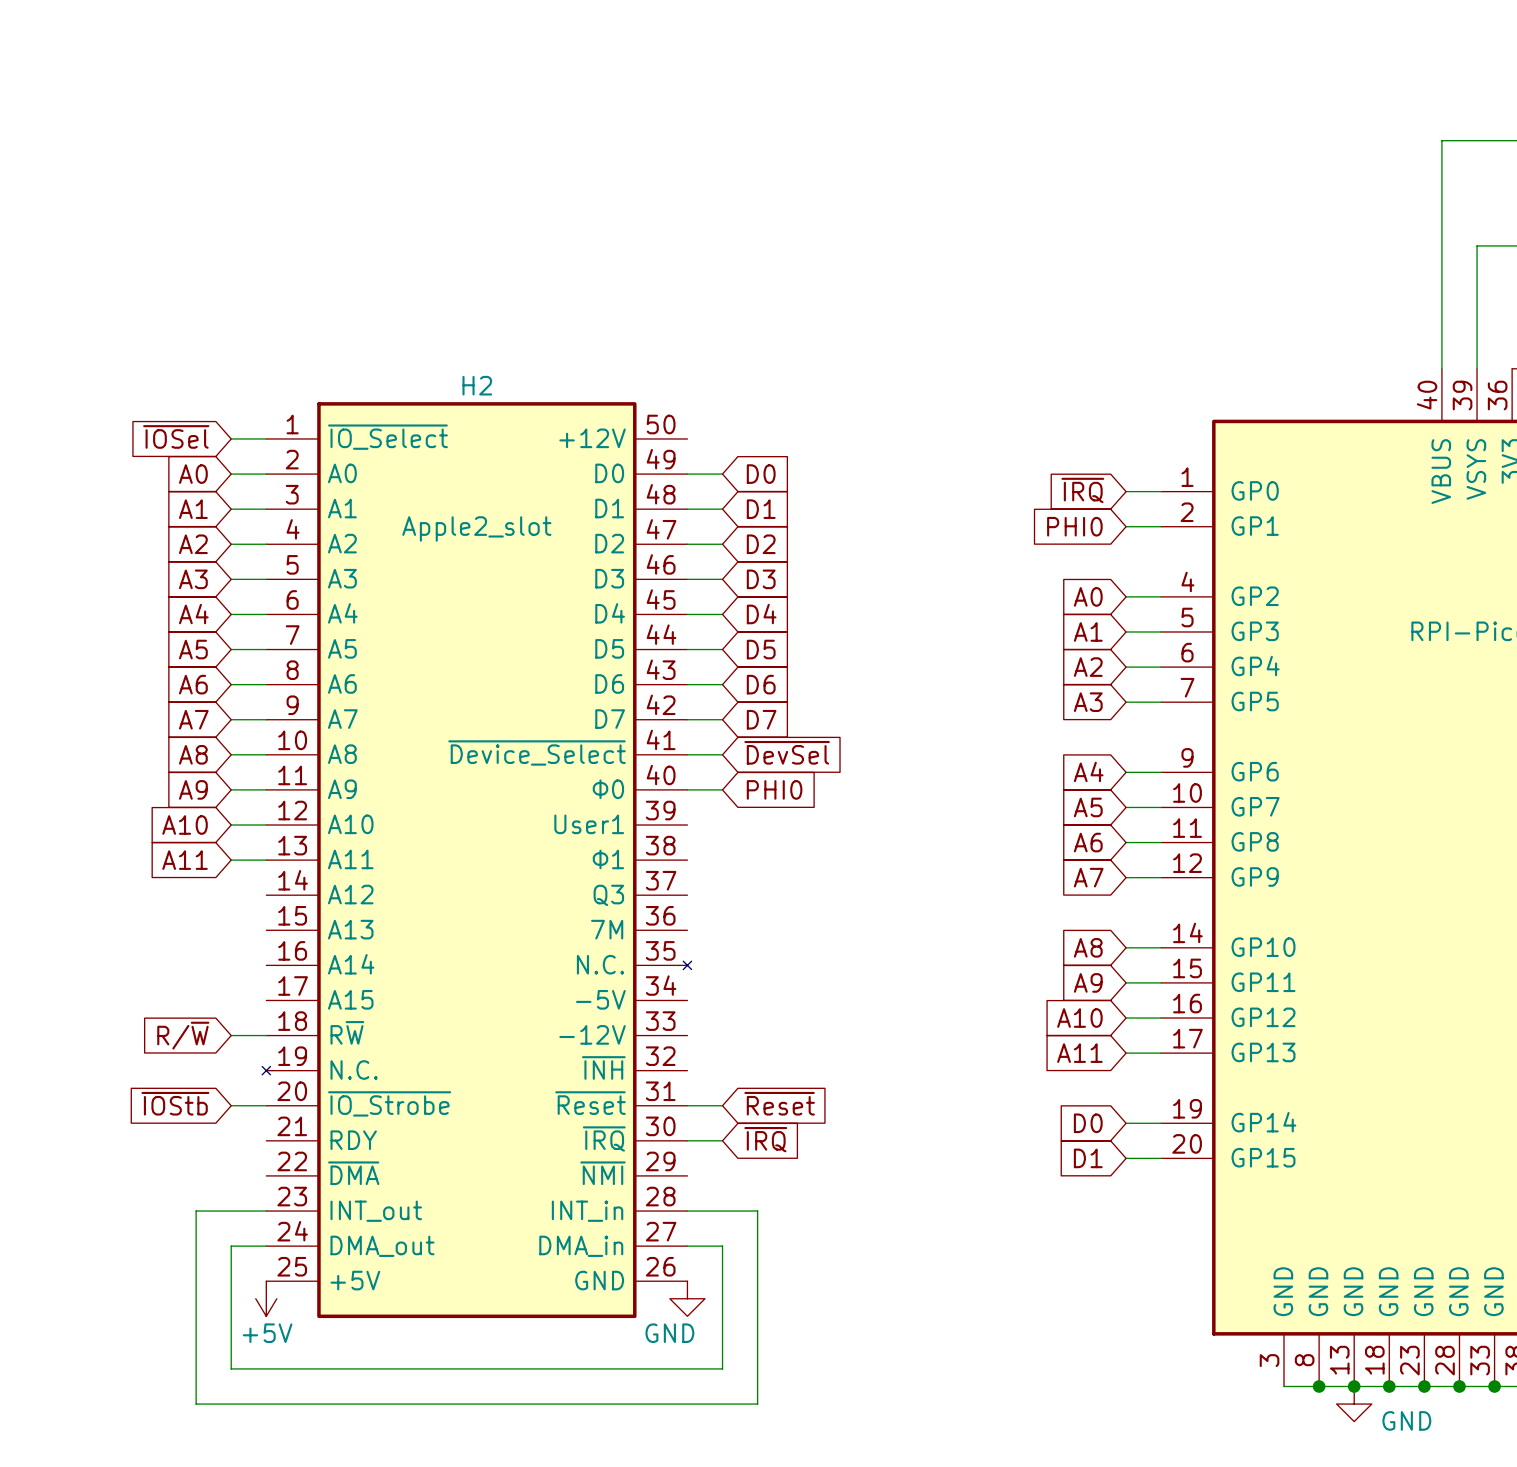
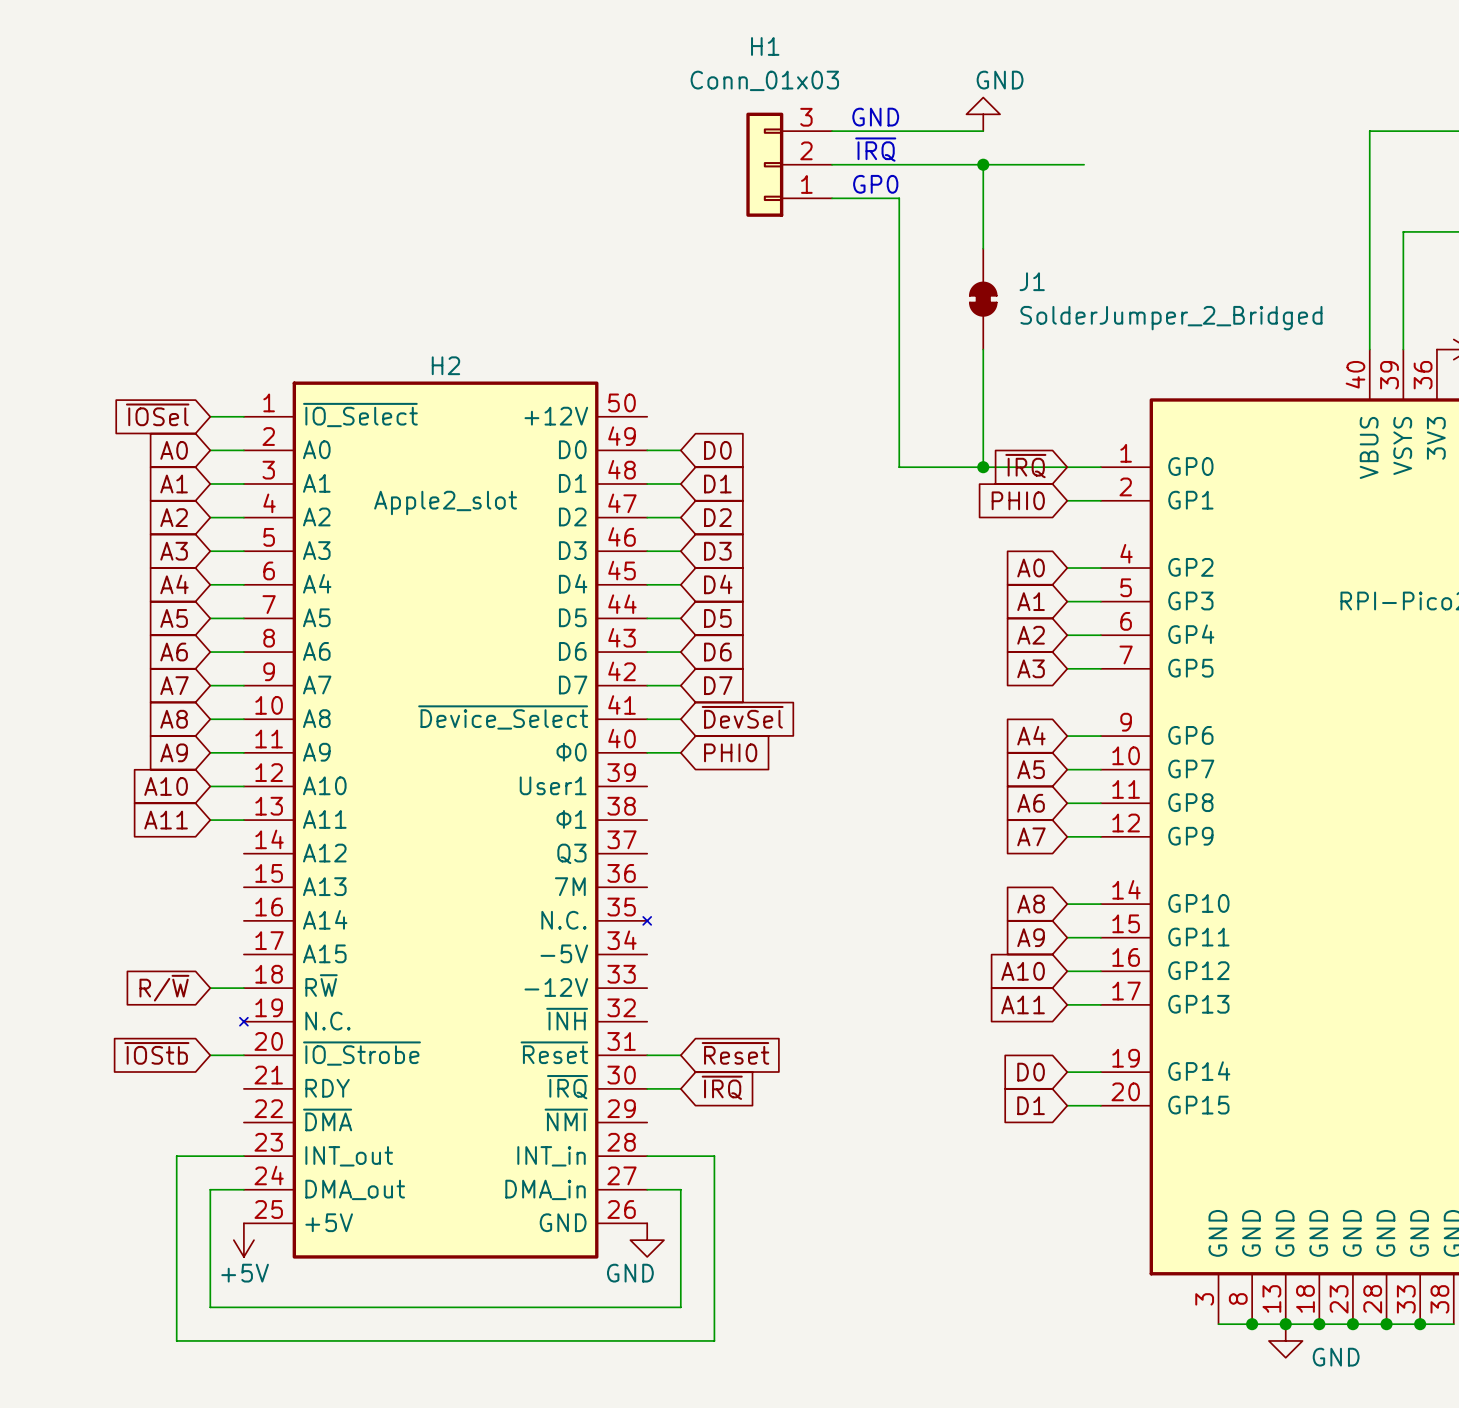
power symbol: none -> GND (983, 114)
text: none -> GND (875, 117)
wire: none -> (832, 131) (983, 131)
text: none -> ~{IRQ} (875, 149)
H1: none -> Conn_01x03 (789, 164)
wire: none -> (832, 164) (1084, 164)
wire: none -> (983, 164) (983, 248)
junction: none -> (983, 164)
text: none -> GP0 (875, 184)
wire: none -> (832, 198) (899, 198) (899, 467) (1067, 467)
J1: none -> SolderJumper_2_Bridged (983, 299)
wire: none -> (983, 349) (983, 467)
junction: none -> (983, 467)

